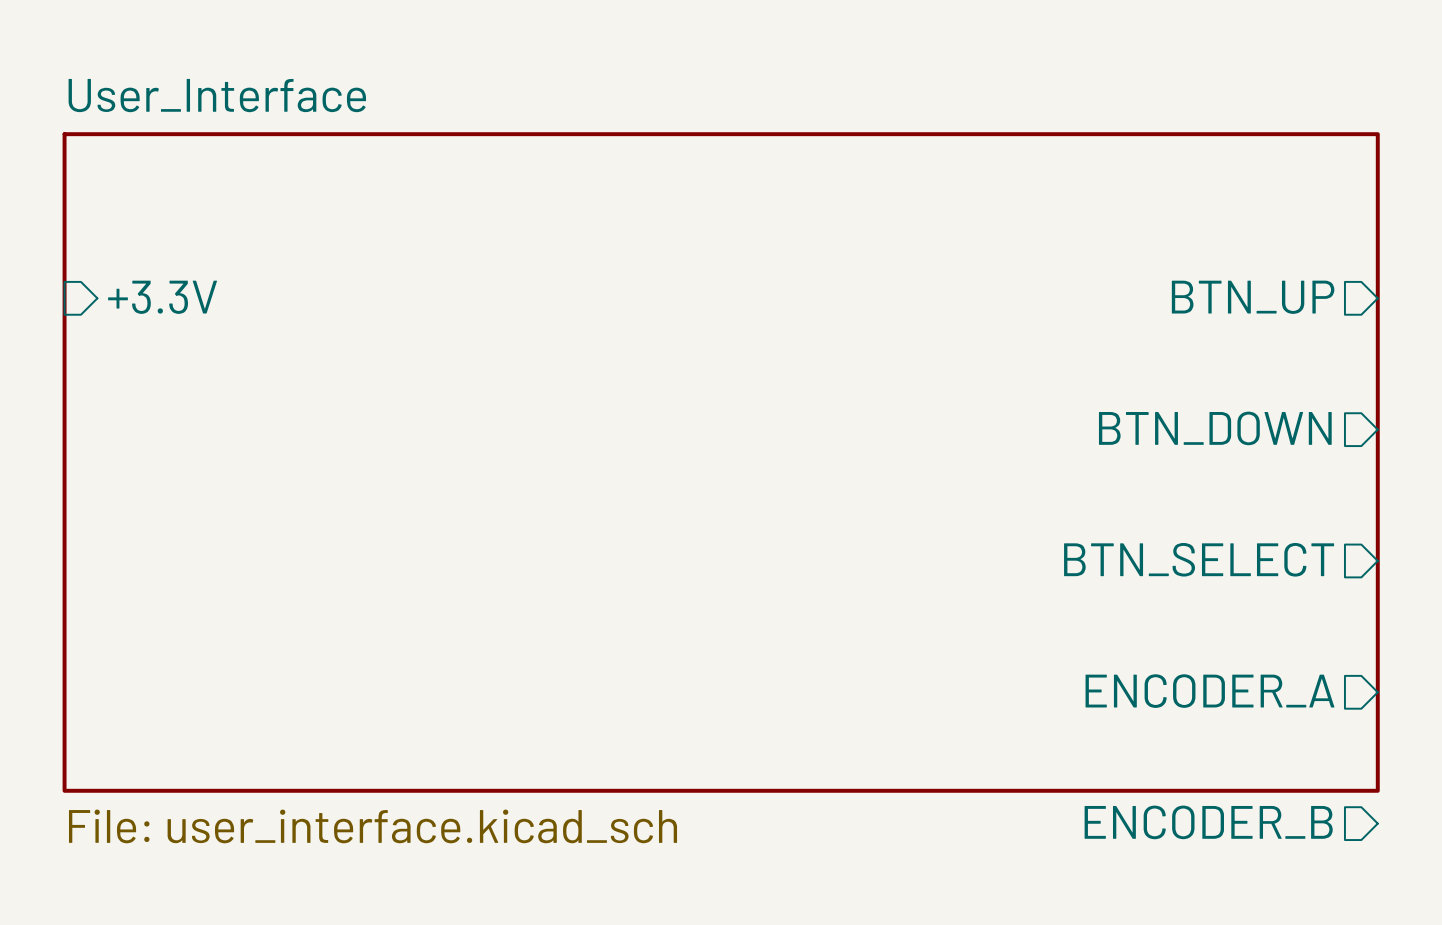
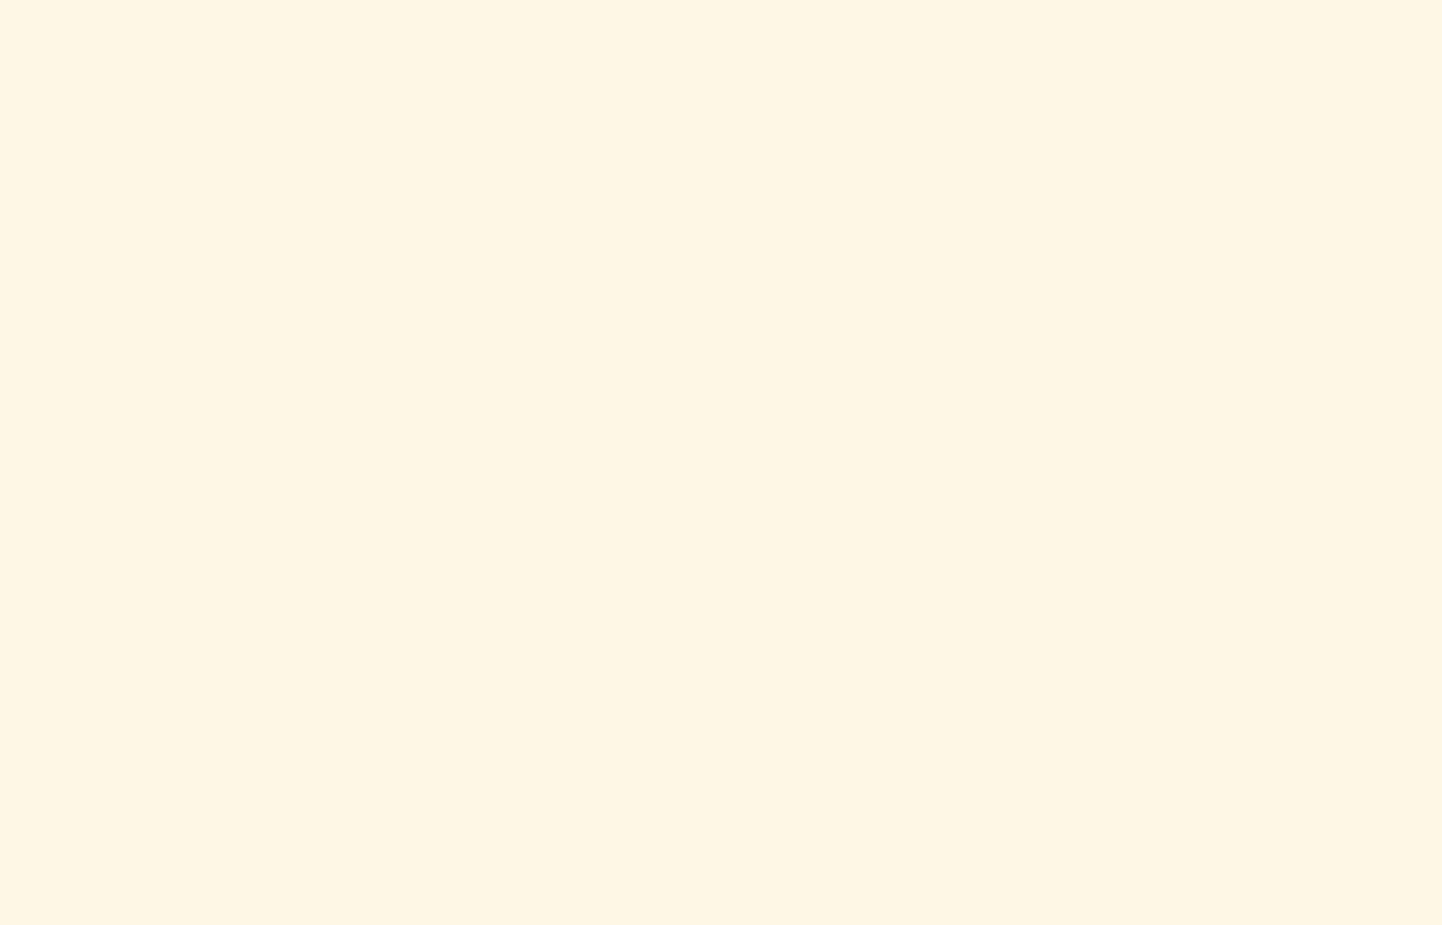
sheet pin: +3.3V (162, 297) -> none
sheet pin: BTN_UP (1253, 297) -> none
sheet pin: BTN_DOWN (1215, 428) -> none
sheet User_Interface: File: user_interface.kicad_sch (721, 462) -> none
sheet pin: BTN_SELECT (1199, 559) -> none
sheet pin: ENCODER_A (1210, 691) -> none
sheet pin: ENCODER_B (1208, 822) -> none

